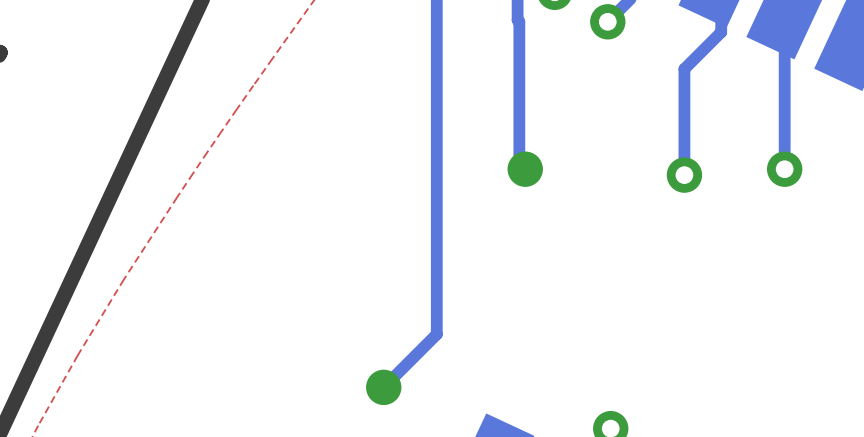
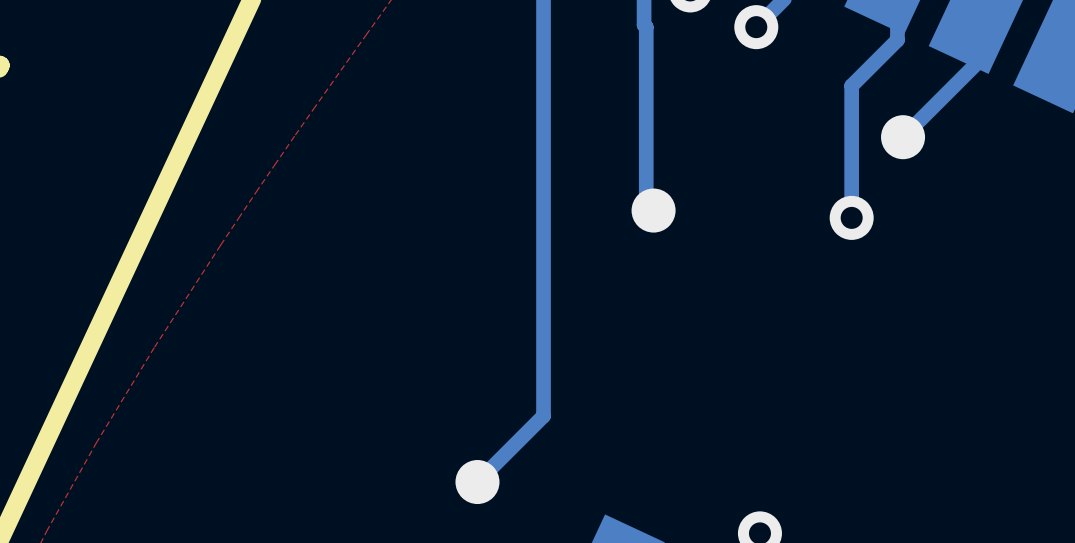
bottom track: (784, 51) (784, 169) -> (976, 63) (903, 137)
via: none -> (903, 137)
via: (784, 169) -> none

